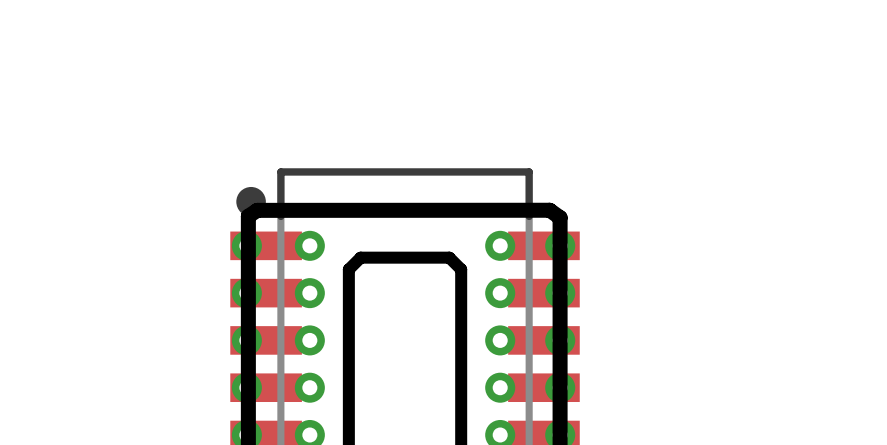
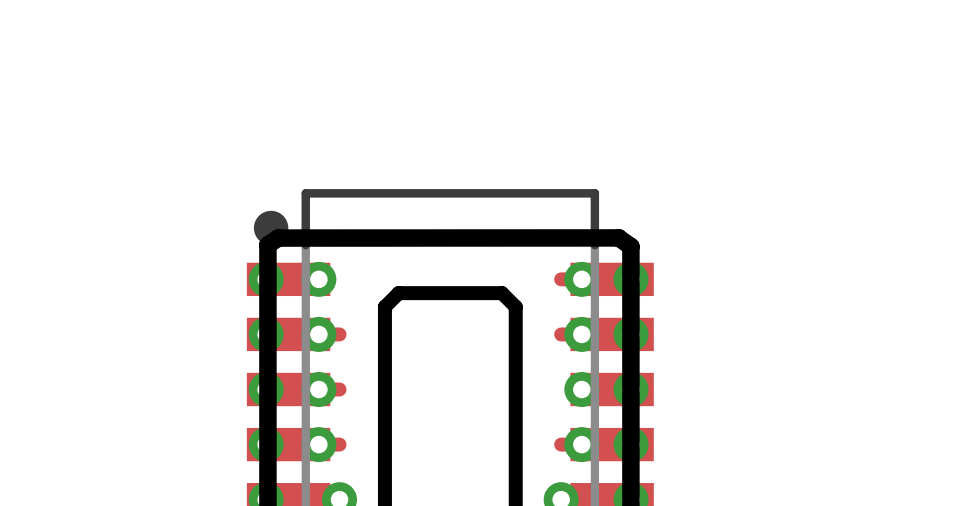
via position: (309, 245) -> (318, 279)
via position: (500, 245) -> (581, 279)
via position: (309, 293) -> (318, 334)
via position: (500, 293) -> (581, 334)
via position: (309, 340) -> (318, 389)
via position: (500, 340) -> (581, 389)
via position: (309, 387) -> (318, 444)
via position: (500, 387) -> (581, 444)

